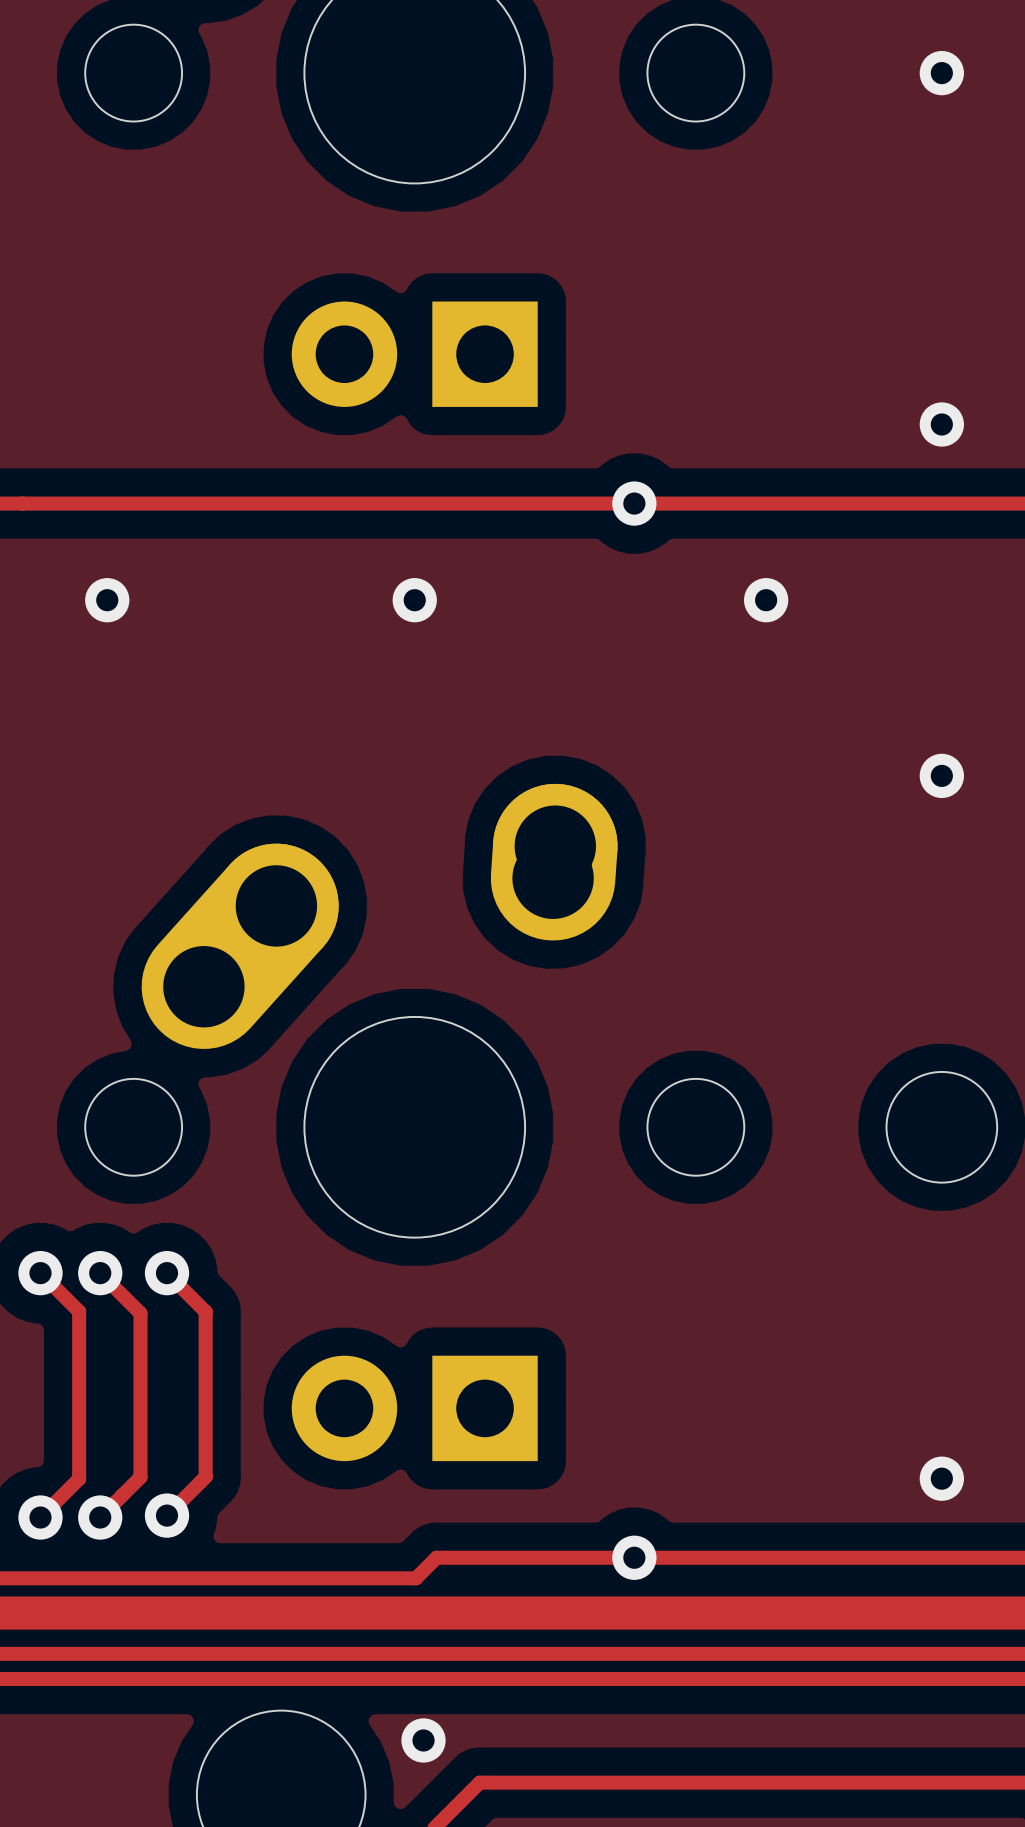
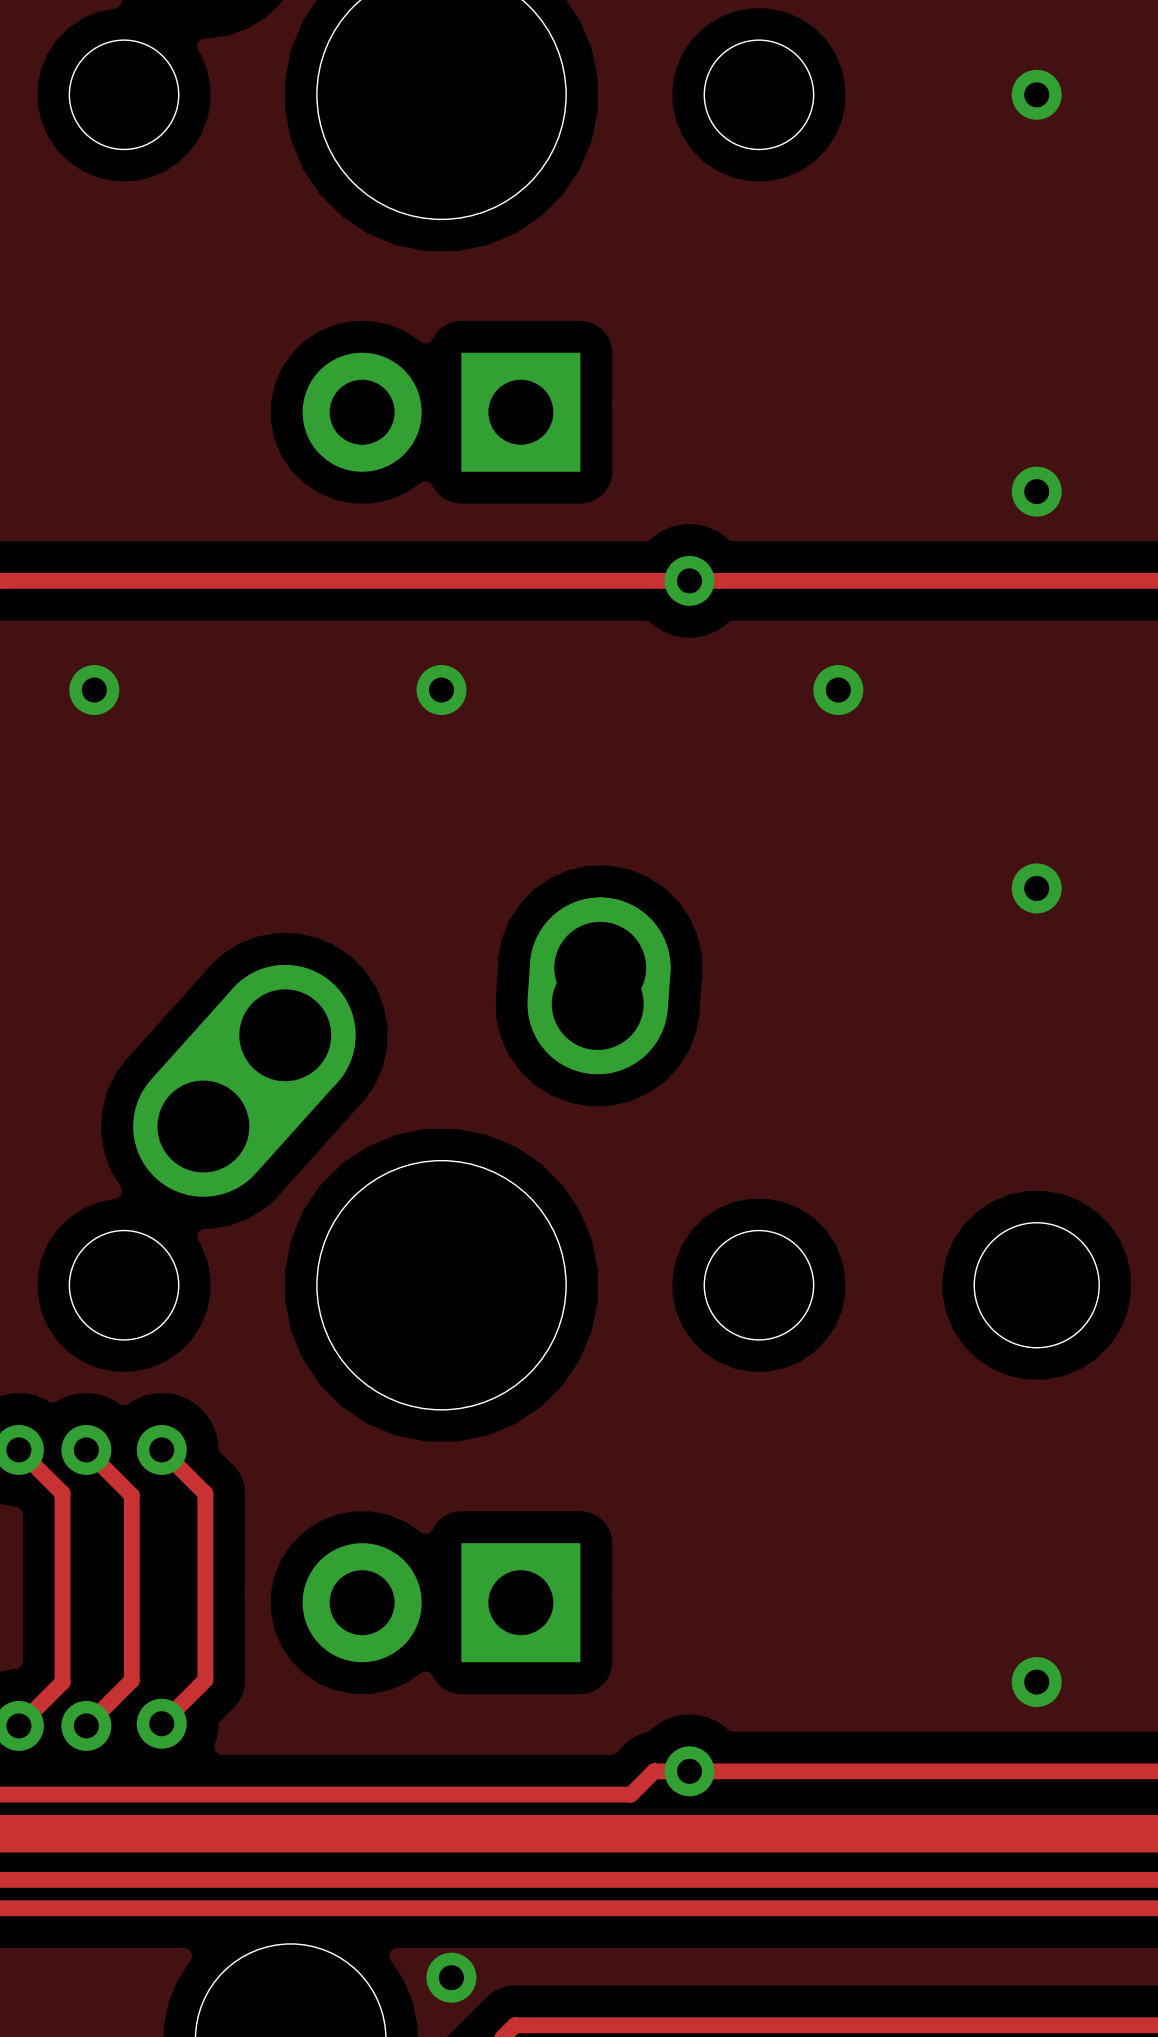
track: (603, 1557) (436, 1557) (415, 1578) -> (654, 1771) (630, 1794) (442, 1794)

